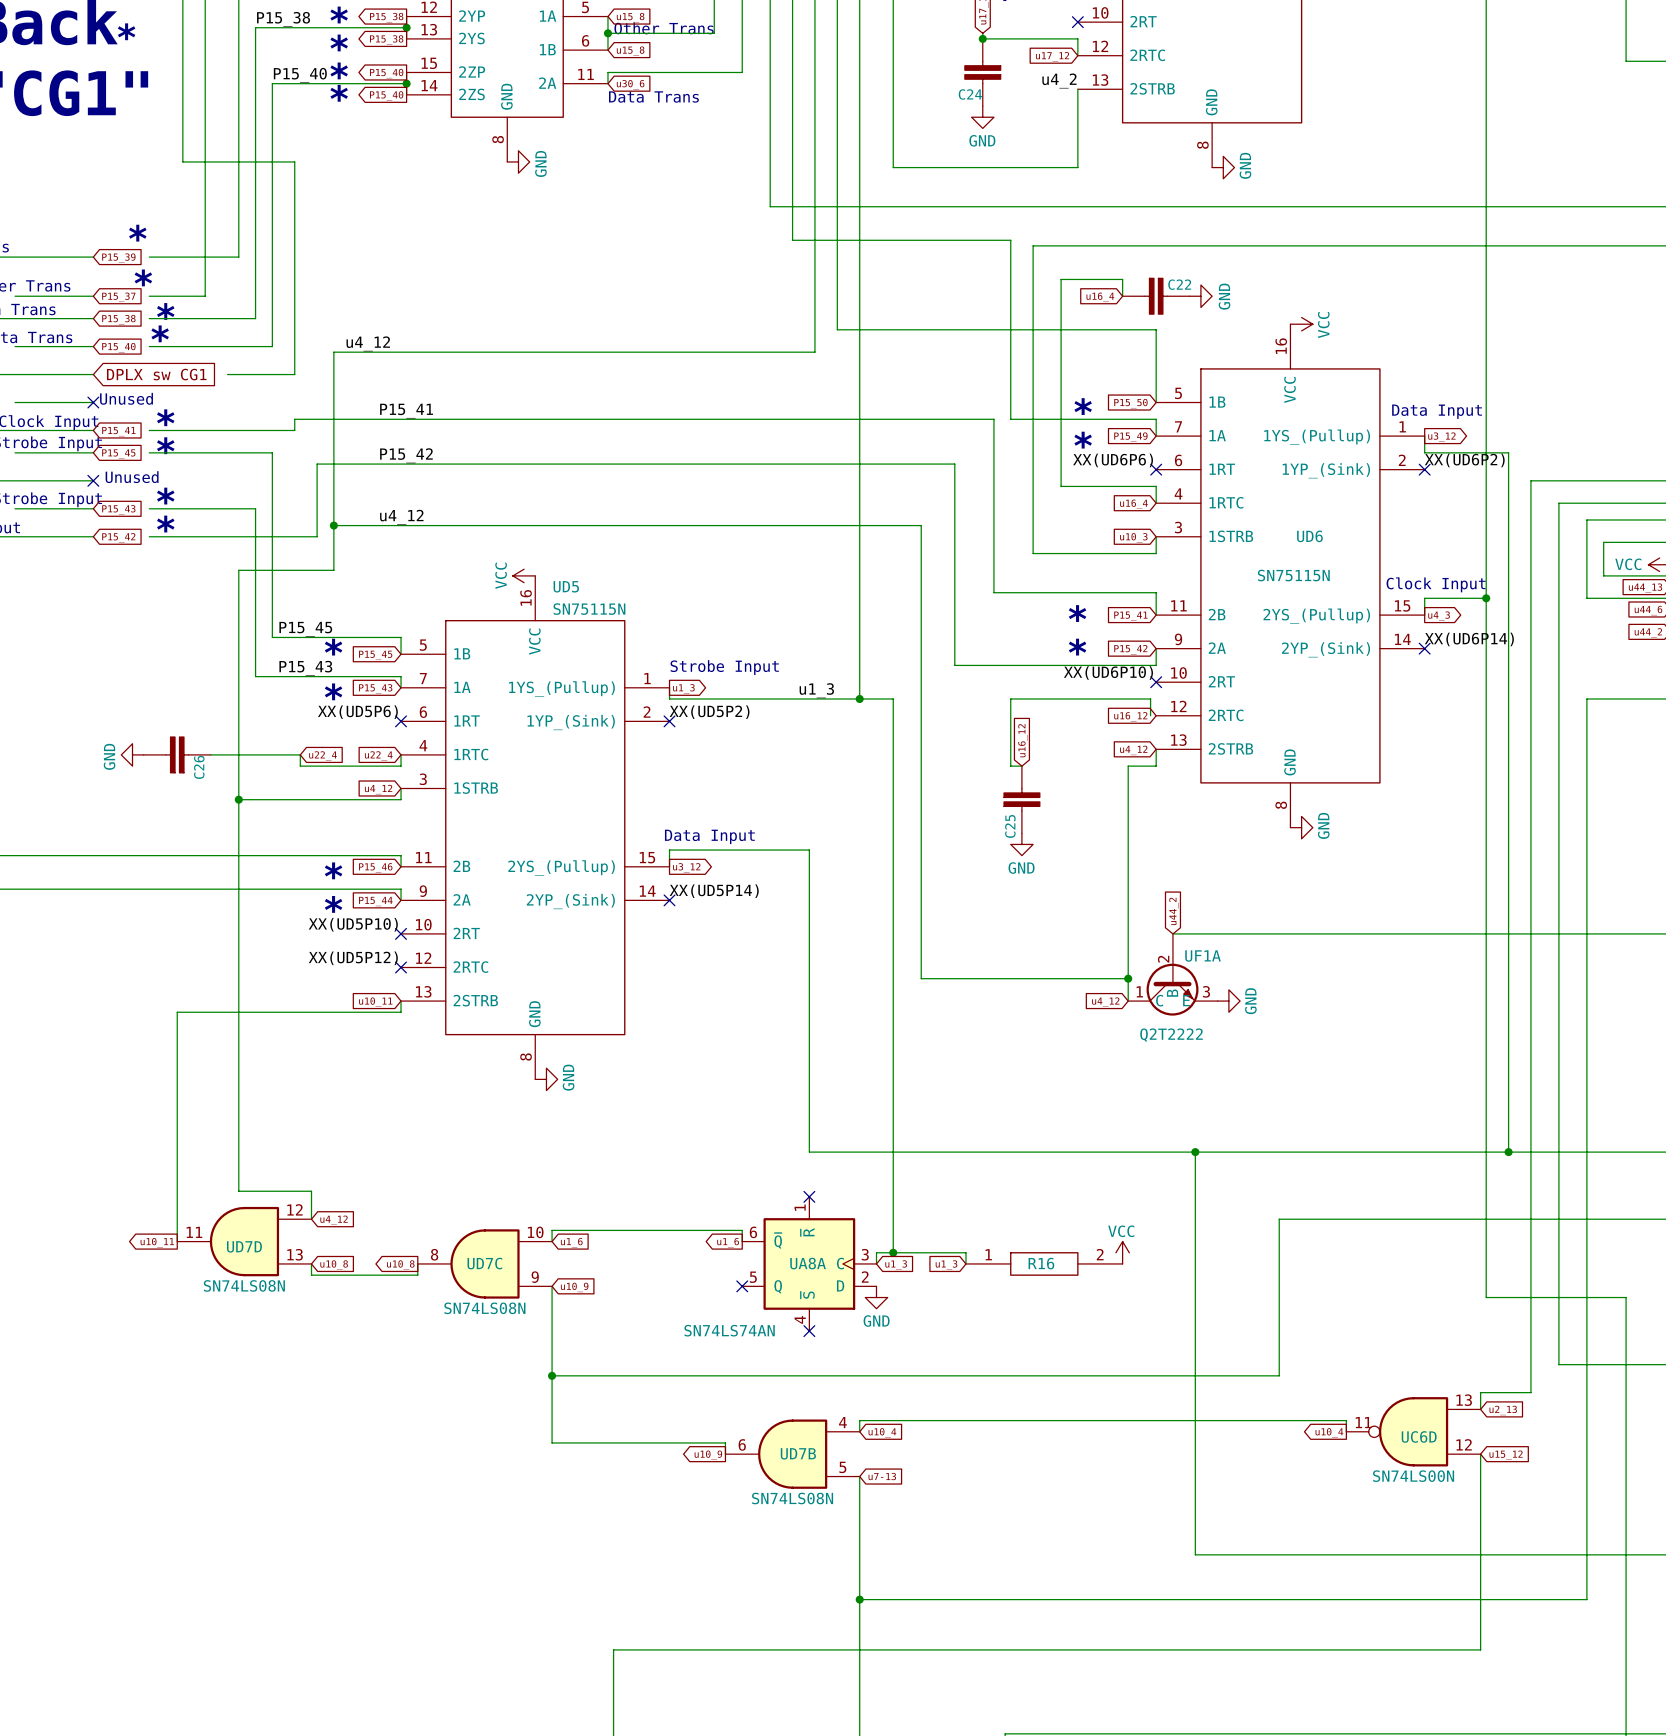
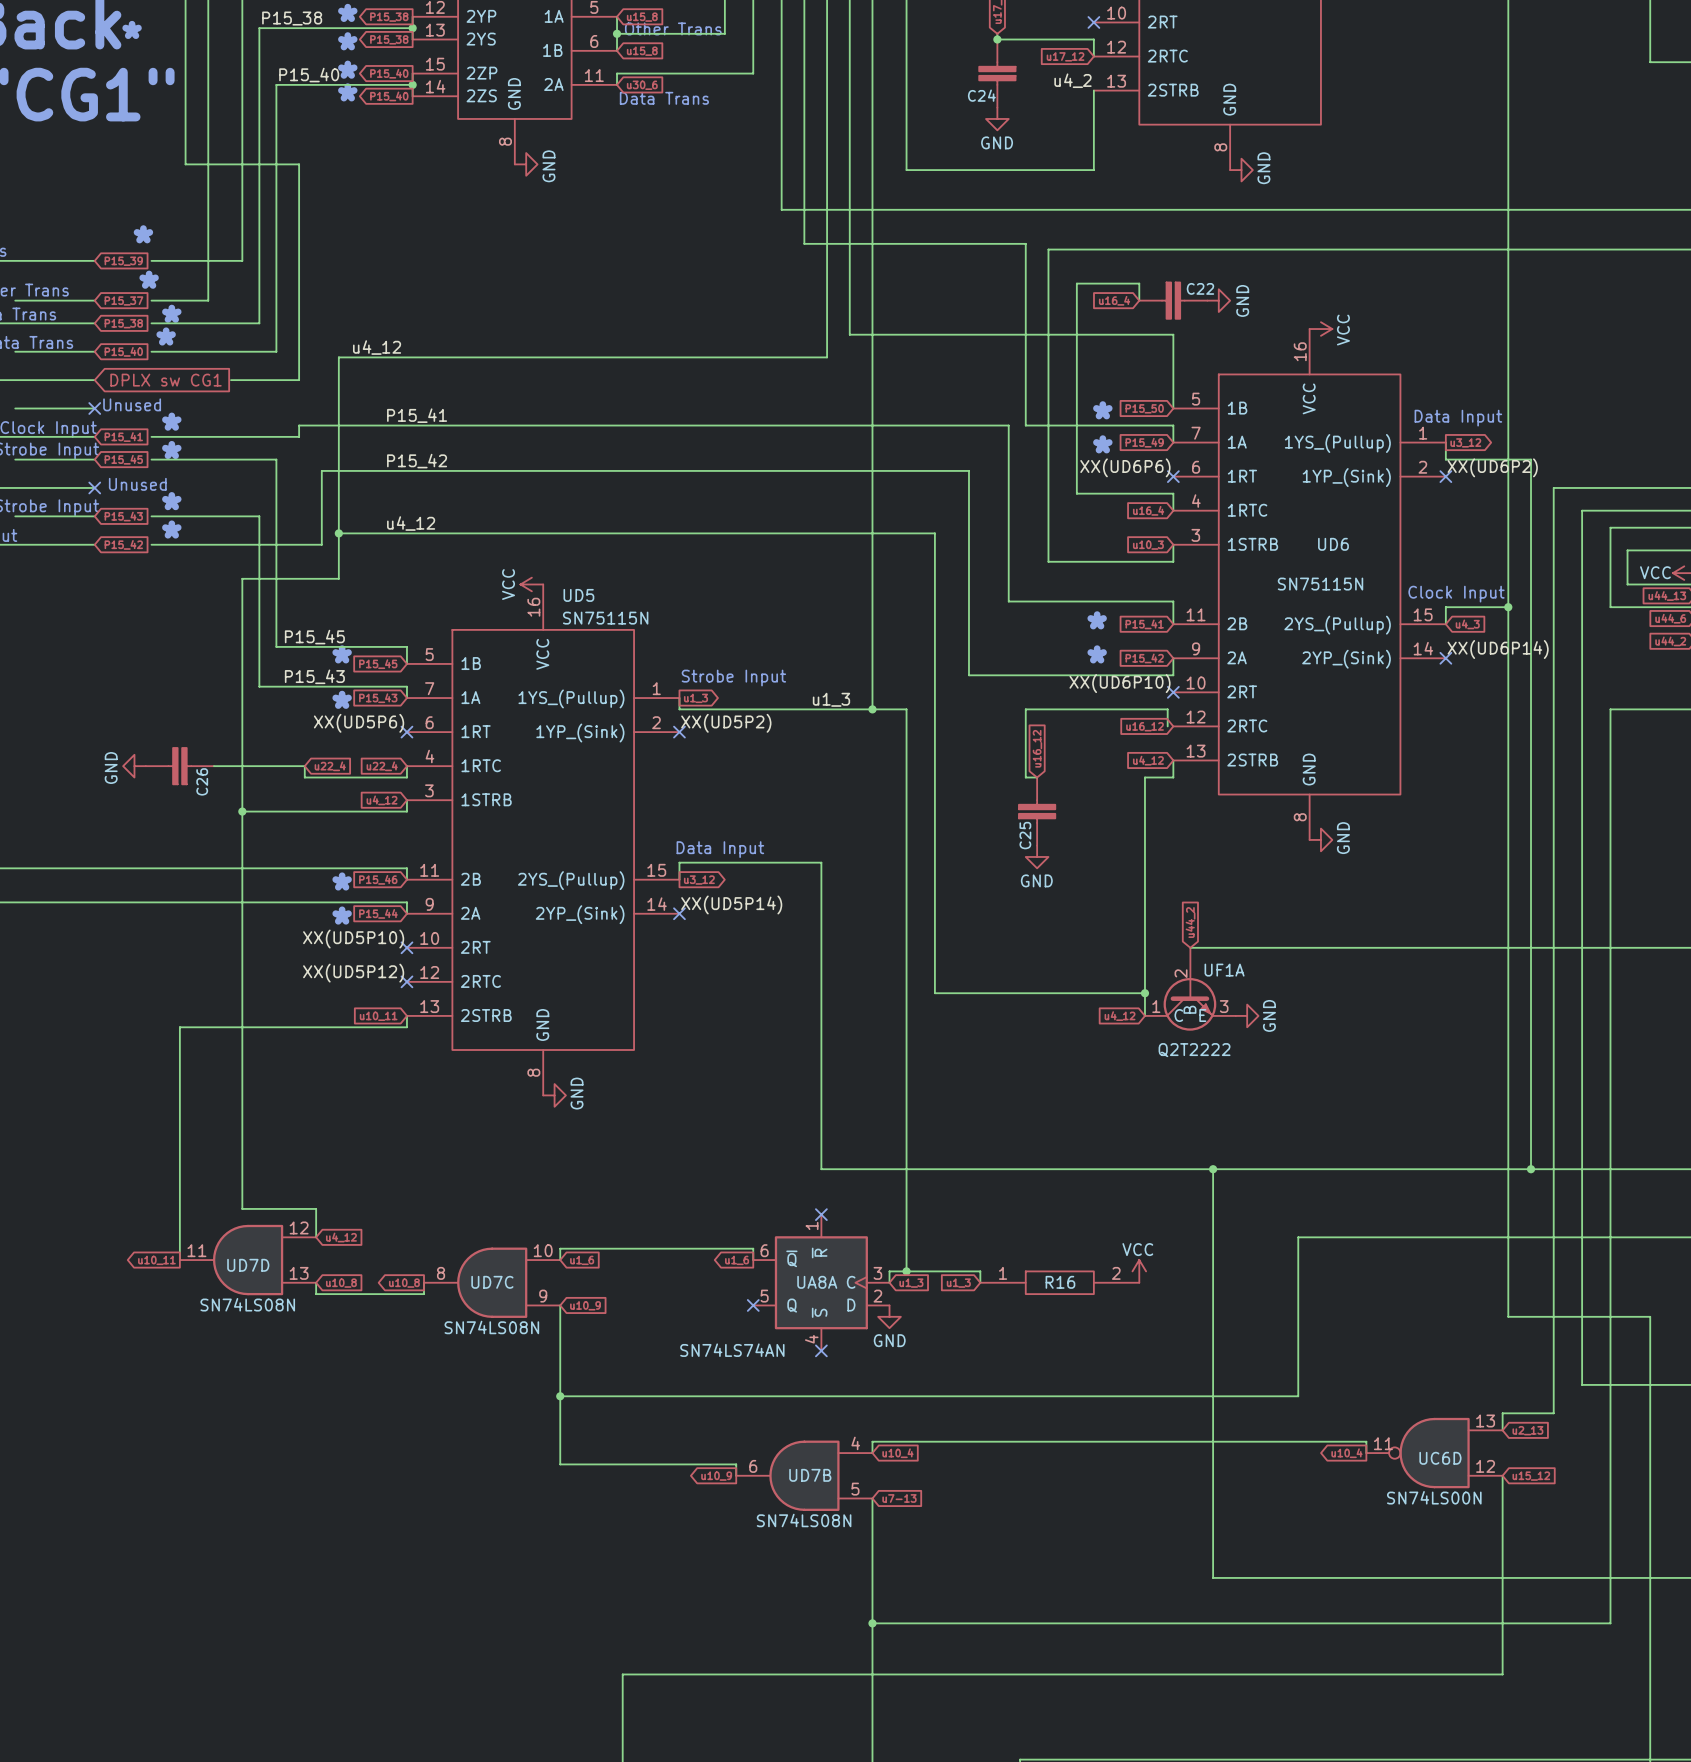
global label shape: output (1439, 616) -> input (1467, 624)

